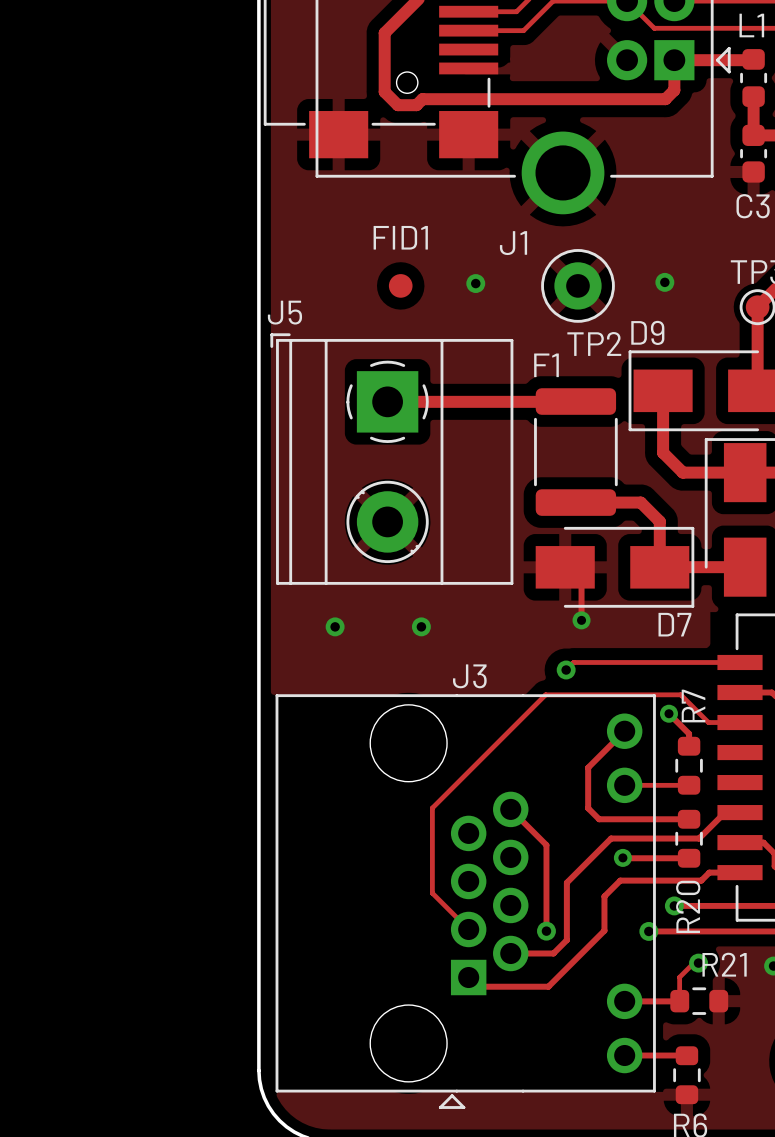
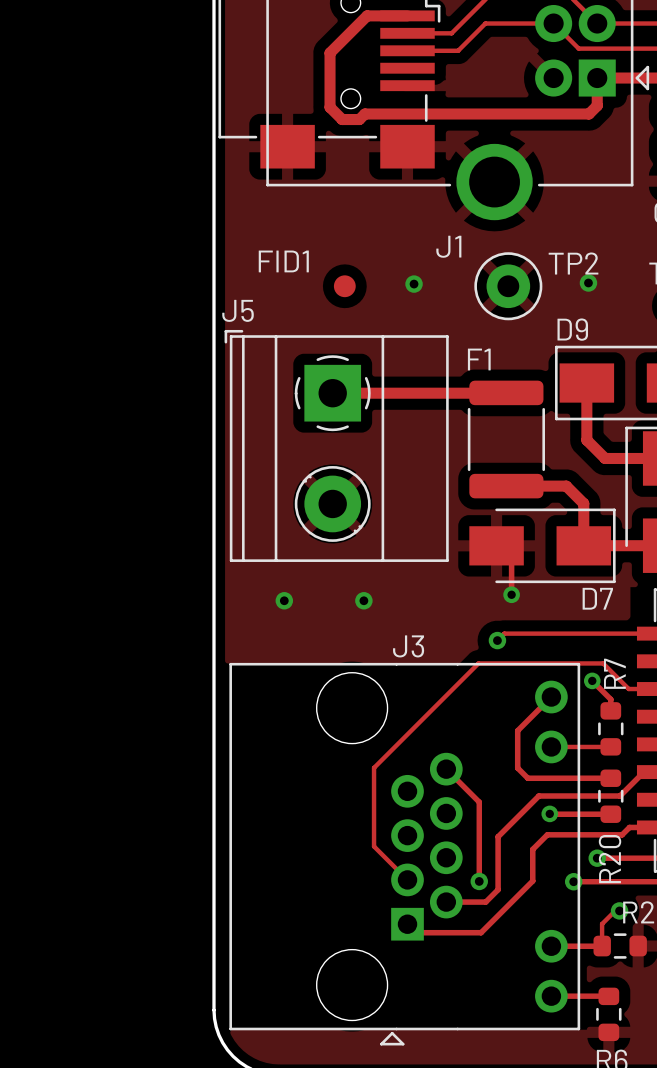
FID1 name position: FID1 (400, 237) -> FID1 (283, 261)
TP2 name position: TP2 (594, 343) -> TP2 (573, 263)

